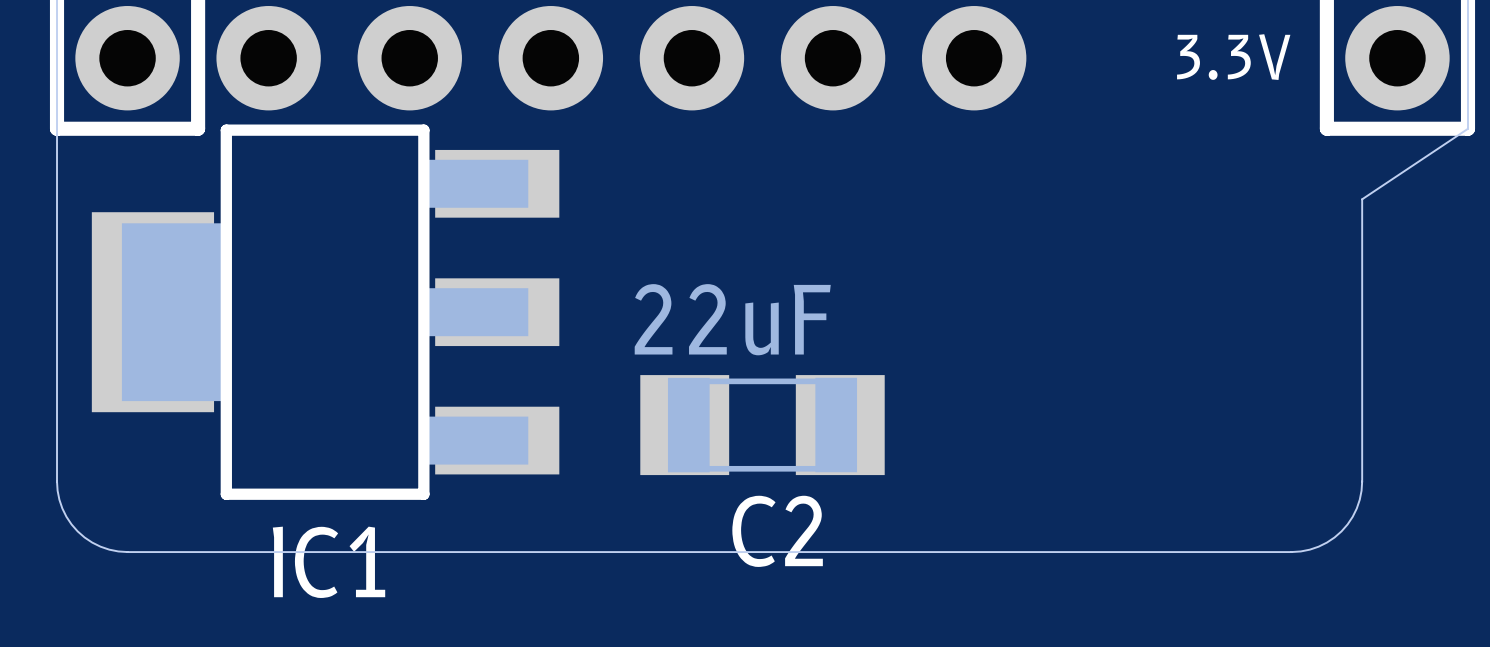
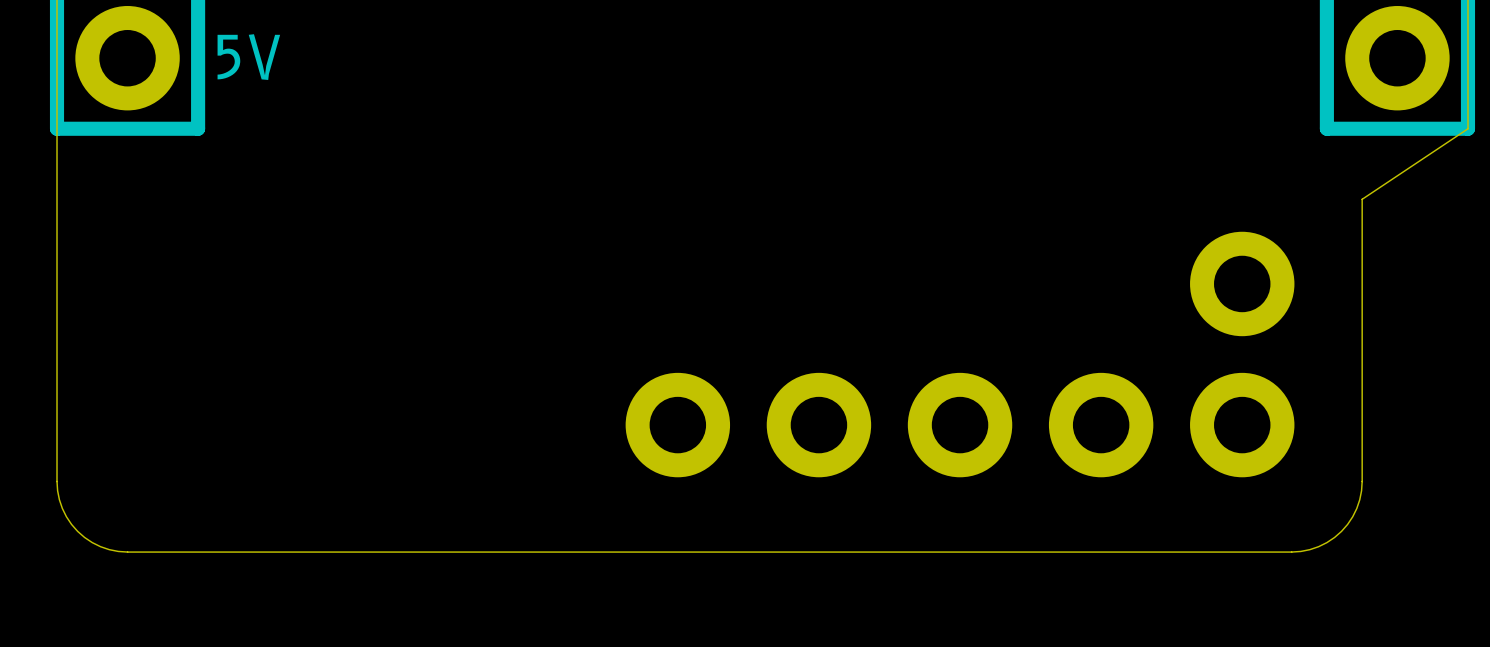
text: none -> 5V (248, 57)
text: 3.3V (1233, 57) -> none
part rotation: 0° (339, 58) -> 90° clockwise (1242, 354)
part position: (339, 58) -> (1242, 354)
part position: (762, 58) -> (889, 425)
IC1: (325, 312) -> none
C2: 22uF (762, 425) -> none

